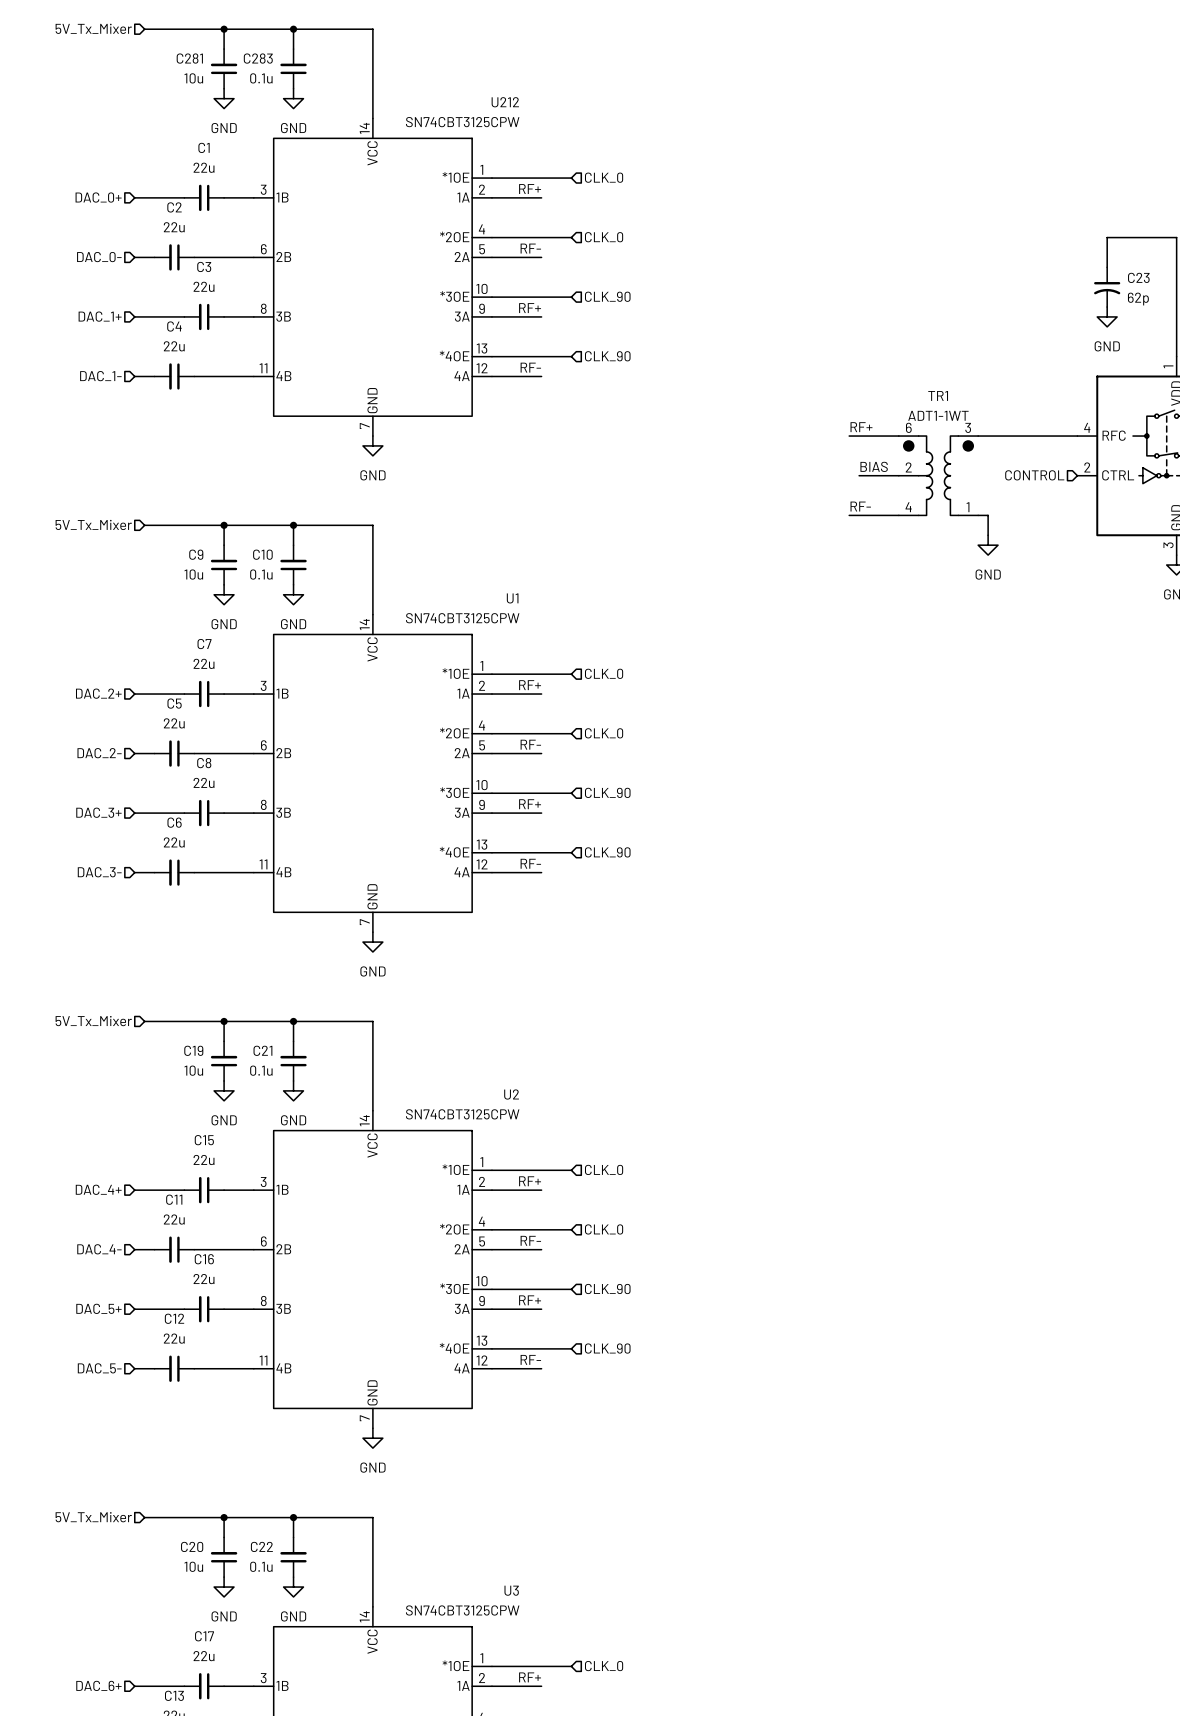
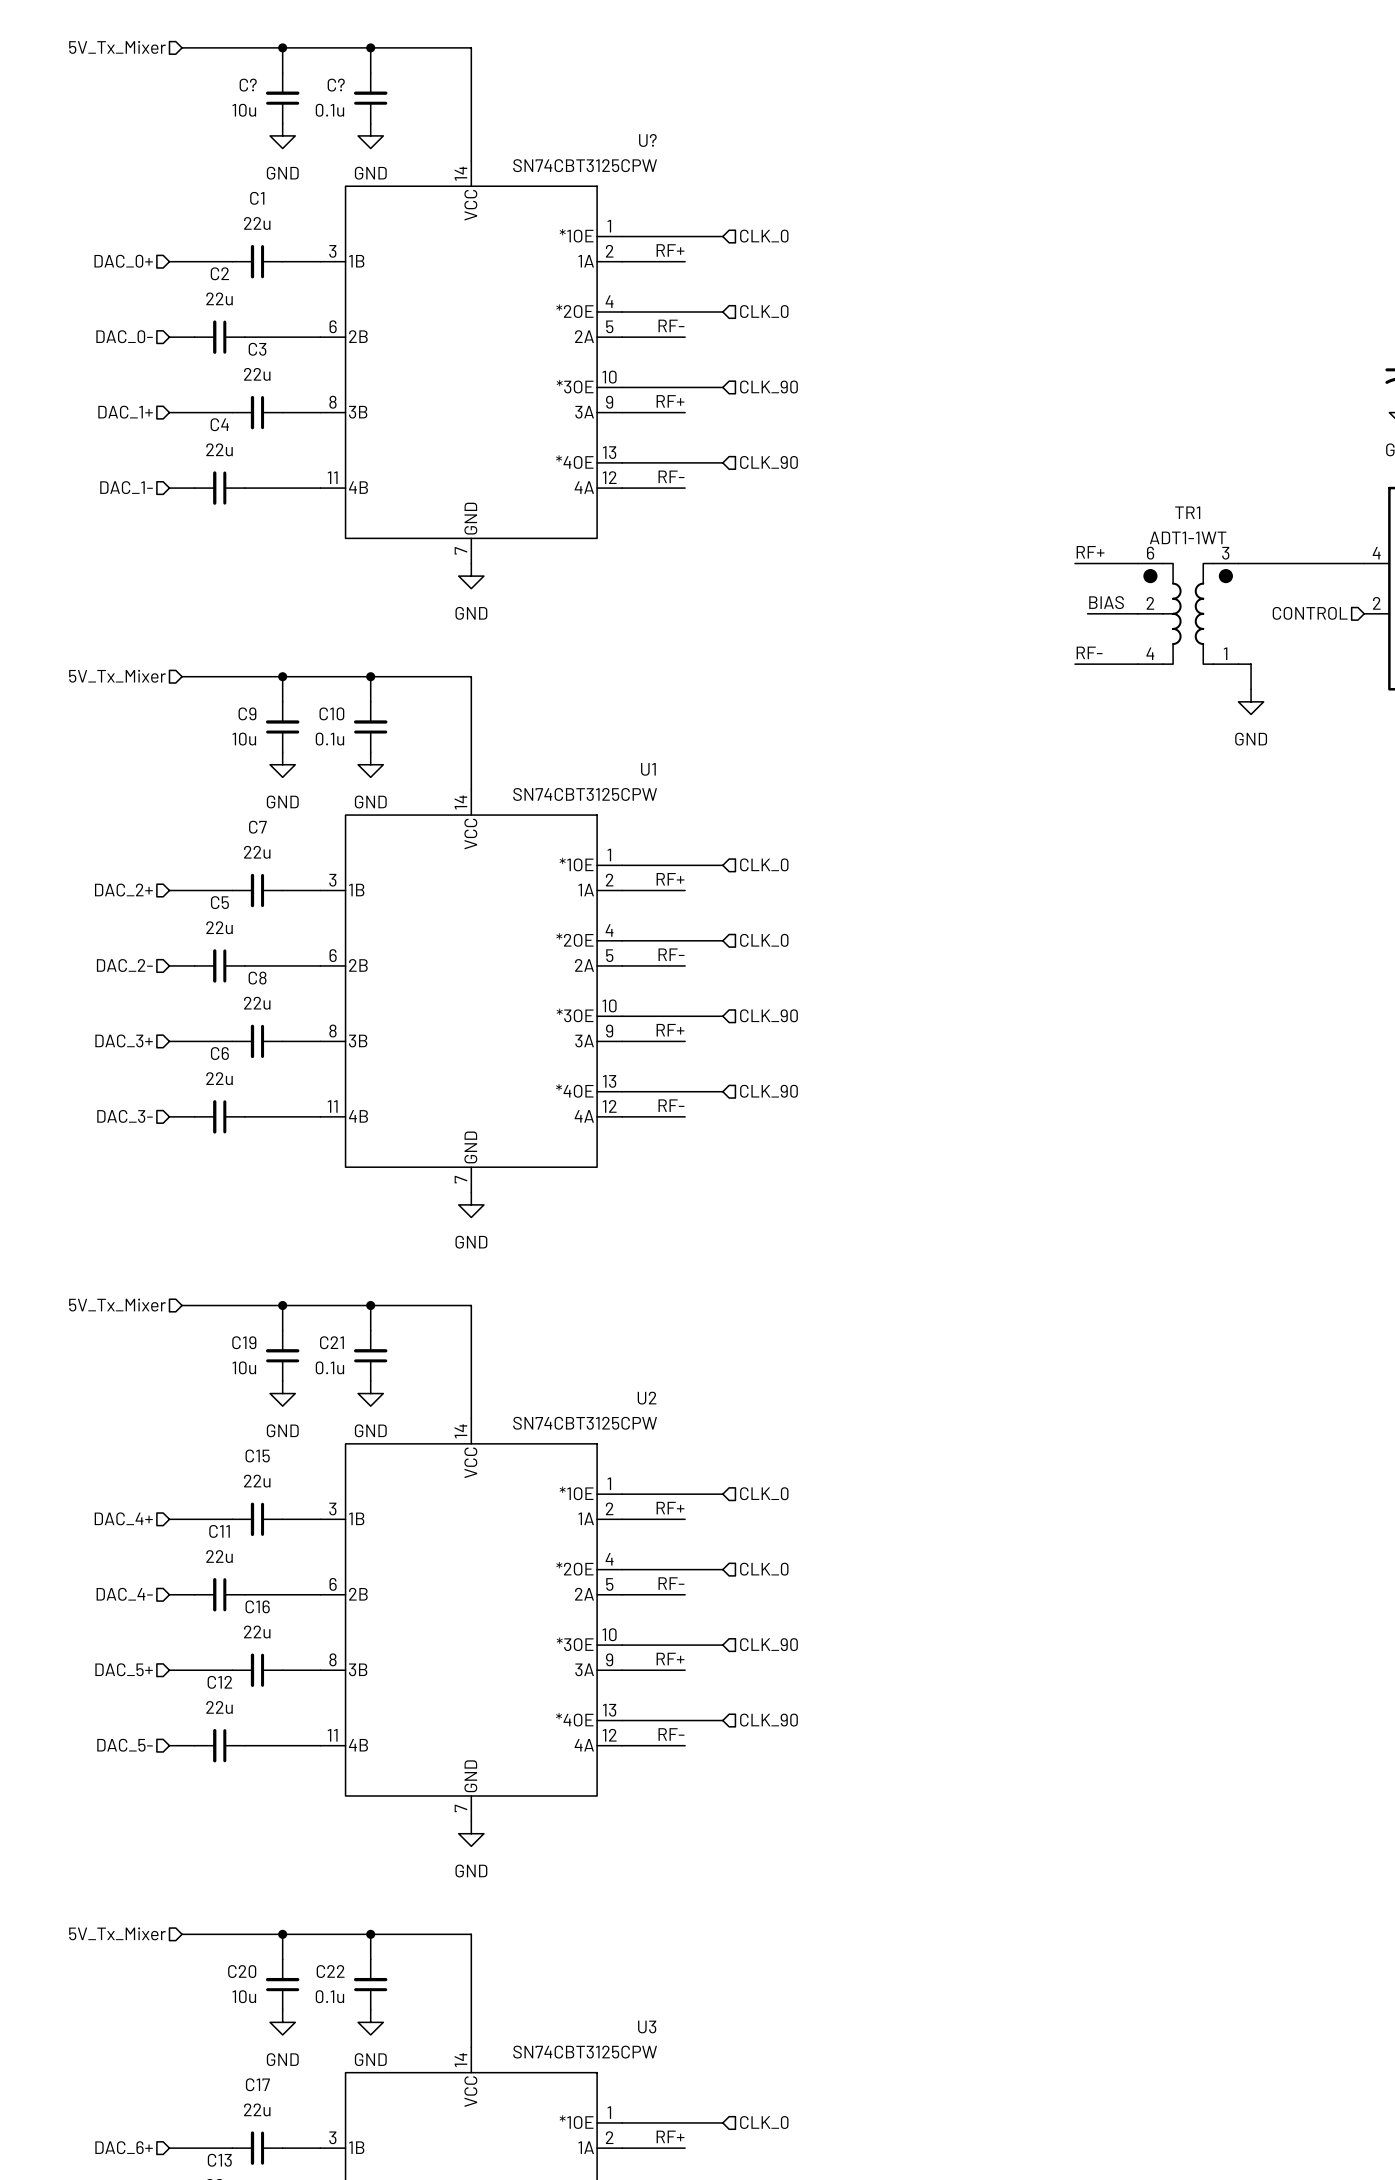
C281 name: C281 (189, 58) -> C? (248, 85)
C283 name: C283 (258, 58) -> C? (336, 85)
U212 name: U212 (505, 102) -> U? (647, 140)

